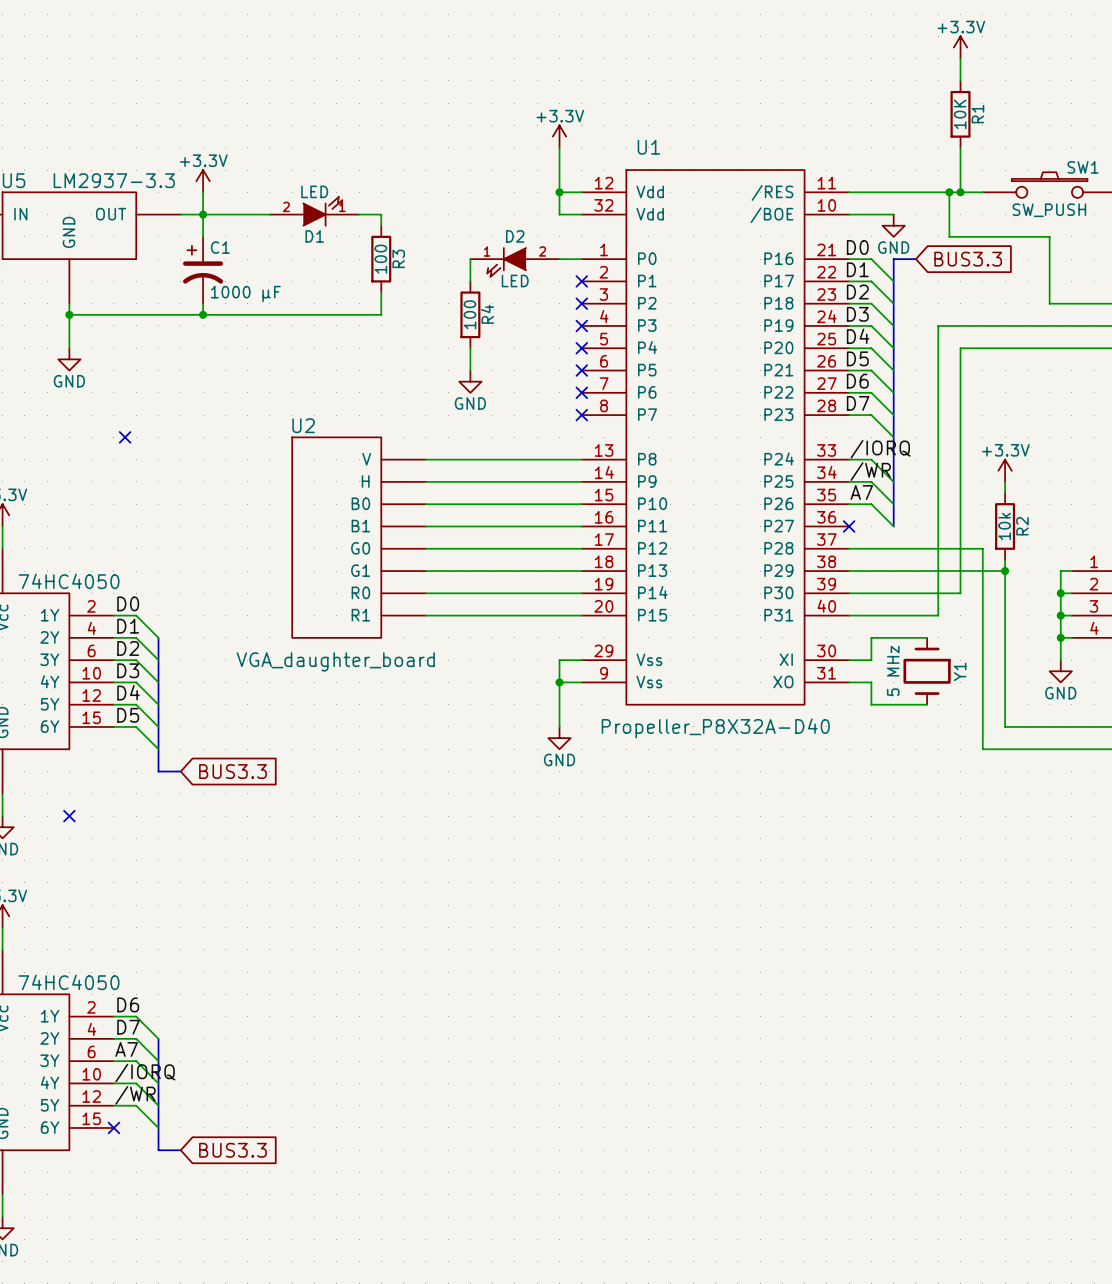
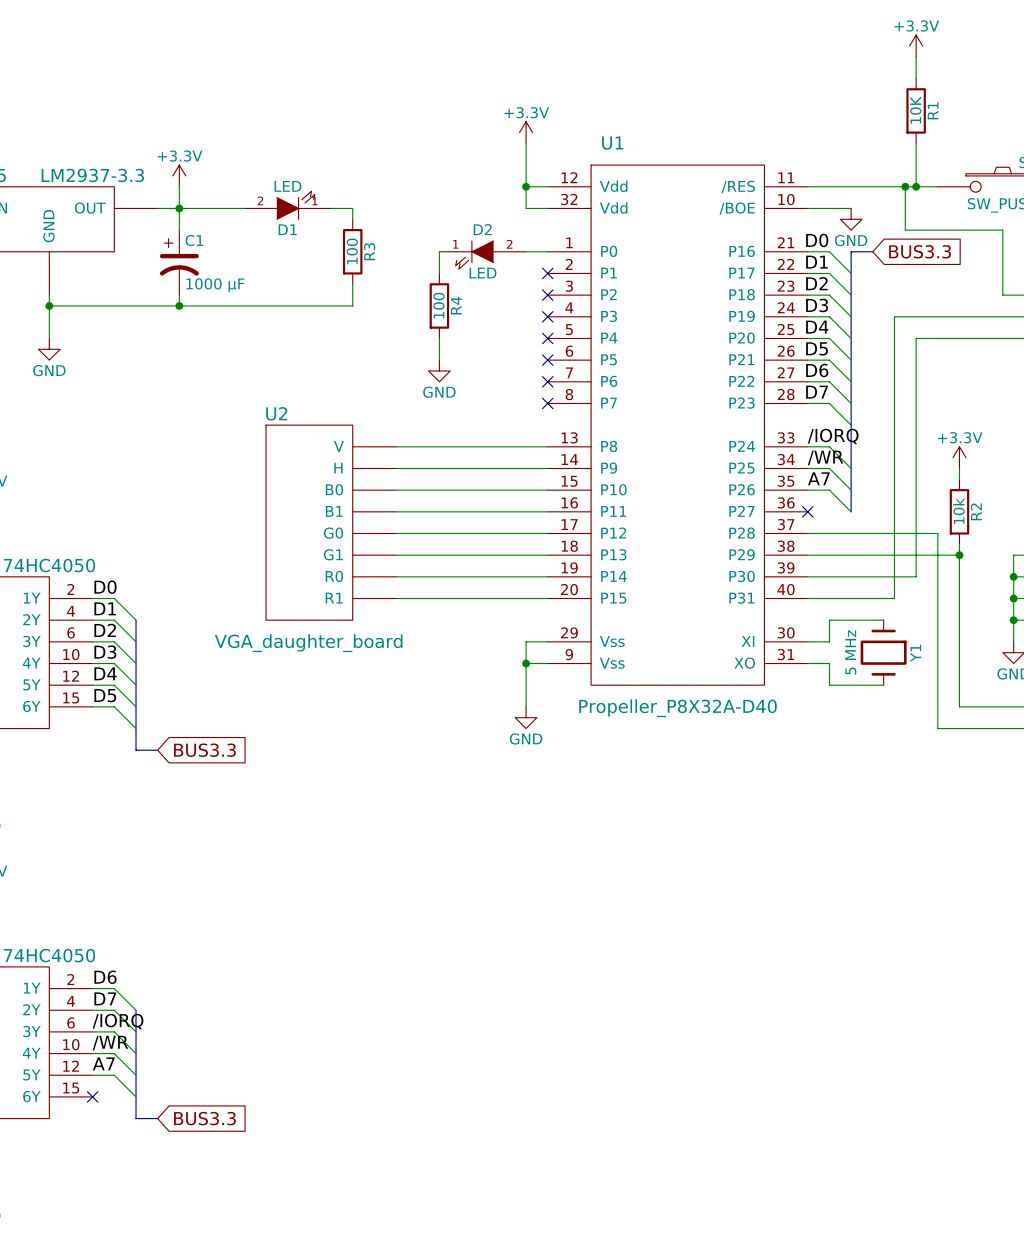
no-connect mark: (125, 437) -> none
no-connect mark: (69, 816) -> none
label: A7 (126, 1049) -> /IORQ (118, 1021)
label: /IORQ (145, 1073) -> /WR (110, 1043)
label: /WR (135, 1095) -> A7 (103, 1063)

